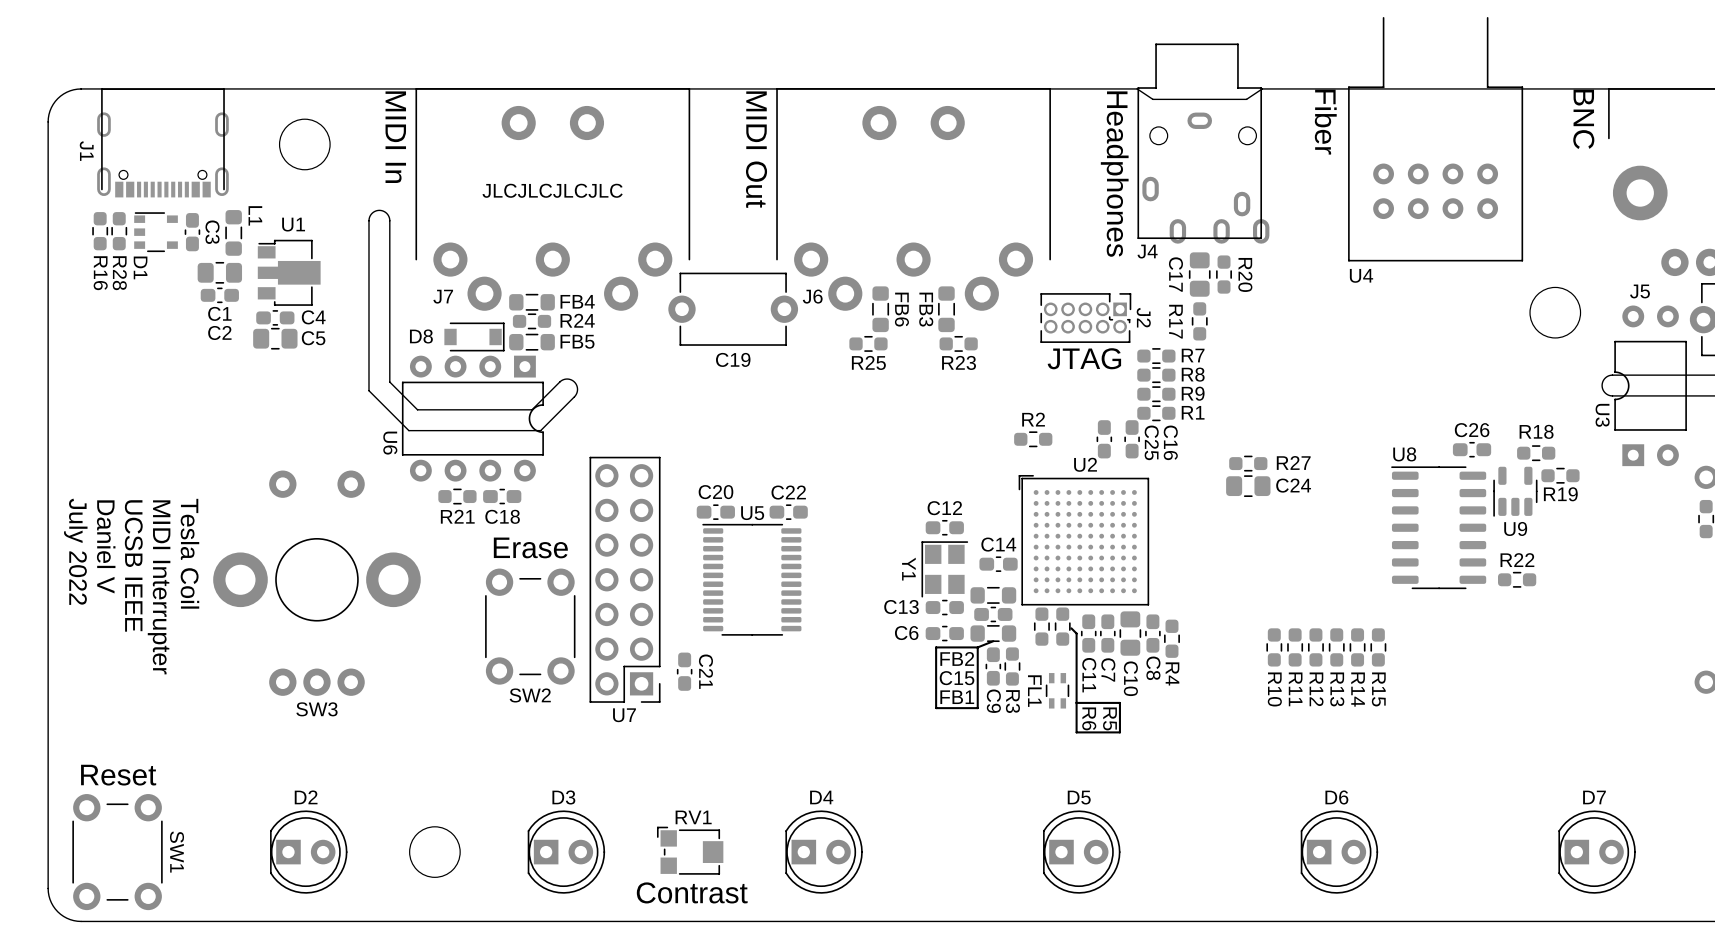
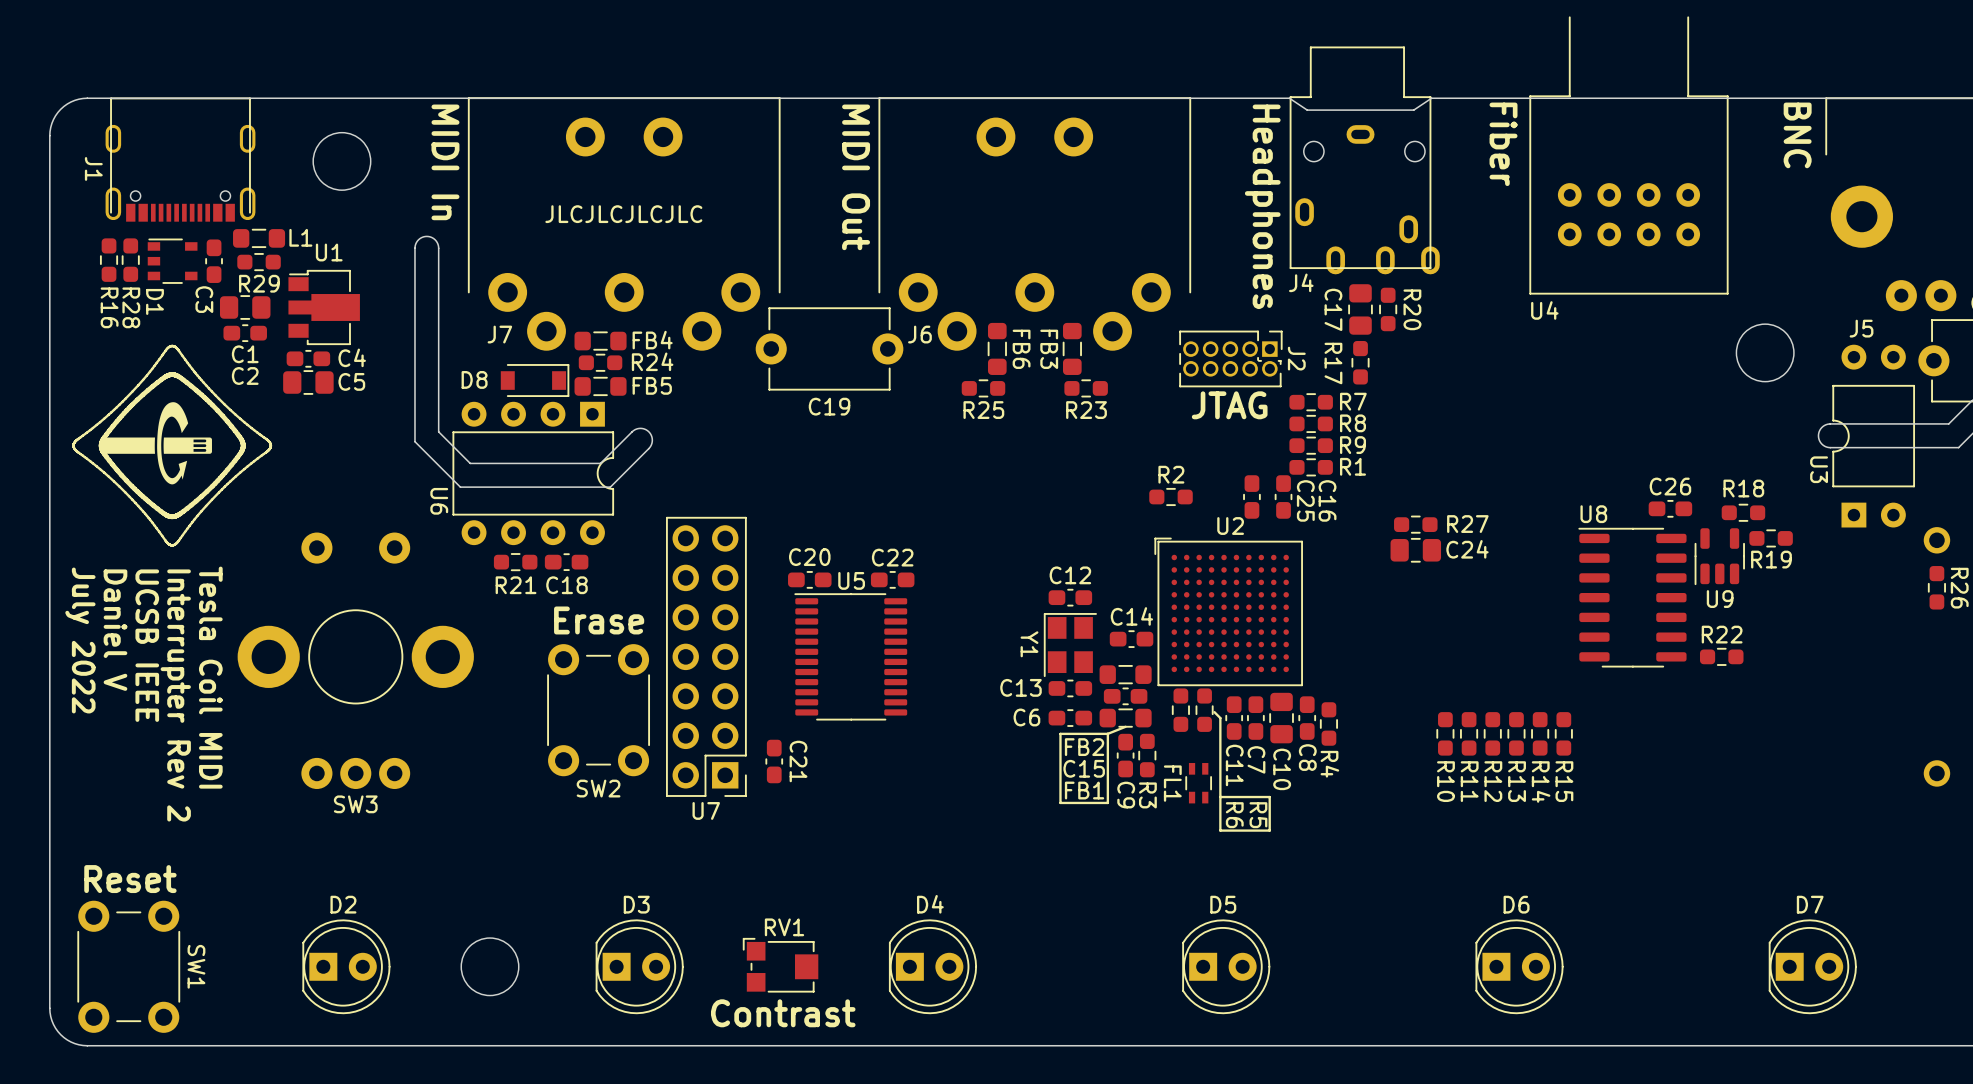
C3 name position: C3 (212, 232) -> C3 (204, 299)
R29: none -> (259, 262)
L1 rotation: 0° (233, 232) -> 90° clockwise (259, 238)
drawing: none -> [72, 344, 273, 547]
text: Tesla Coil (189, 553) -> Tesla Coil MIDI (210, 677)
text: MIDI Interrupter (159, 587) -> Interrupter Rev 2 (175, 695)

